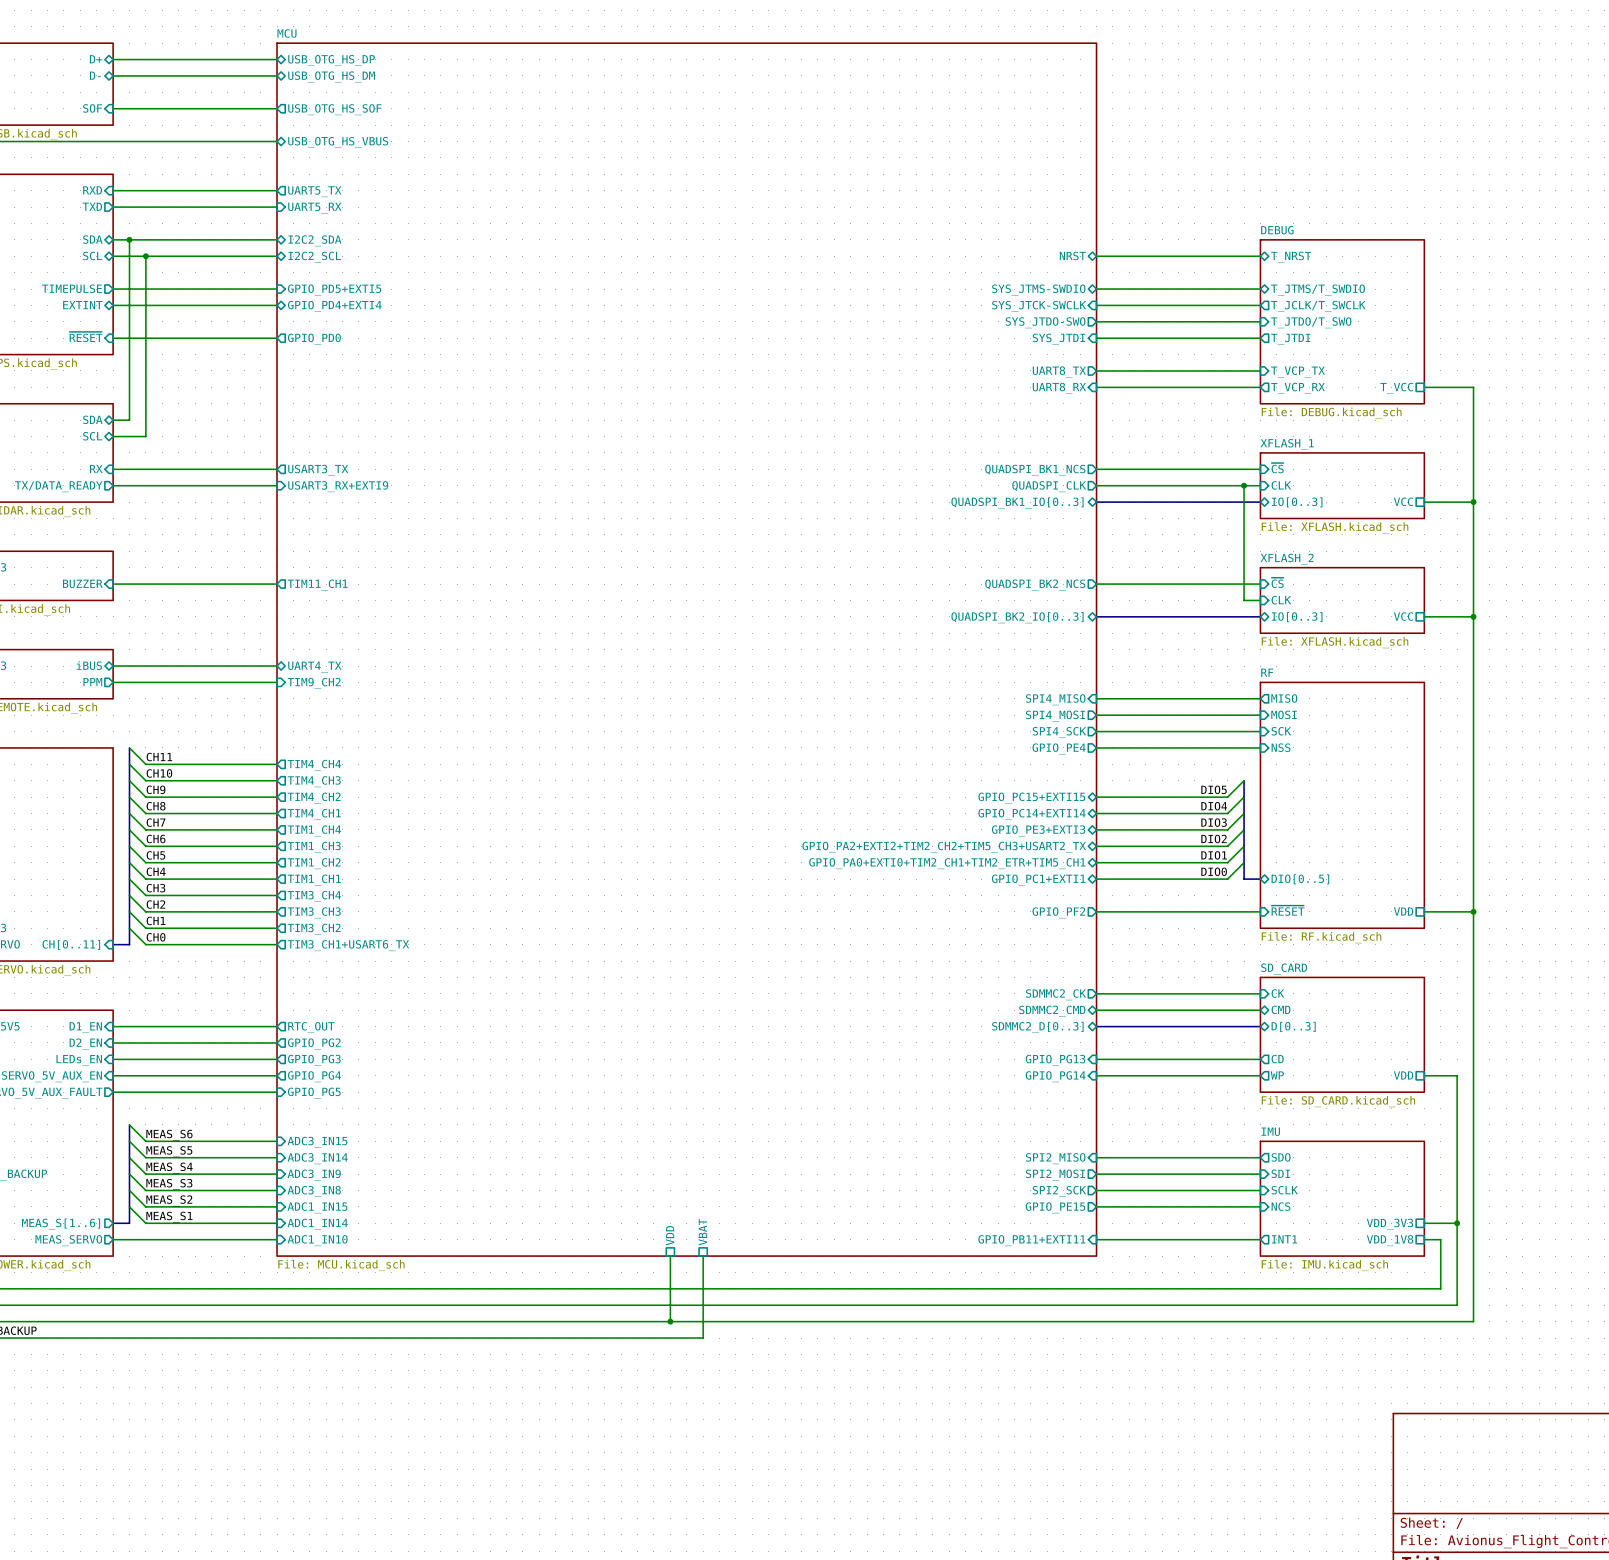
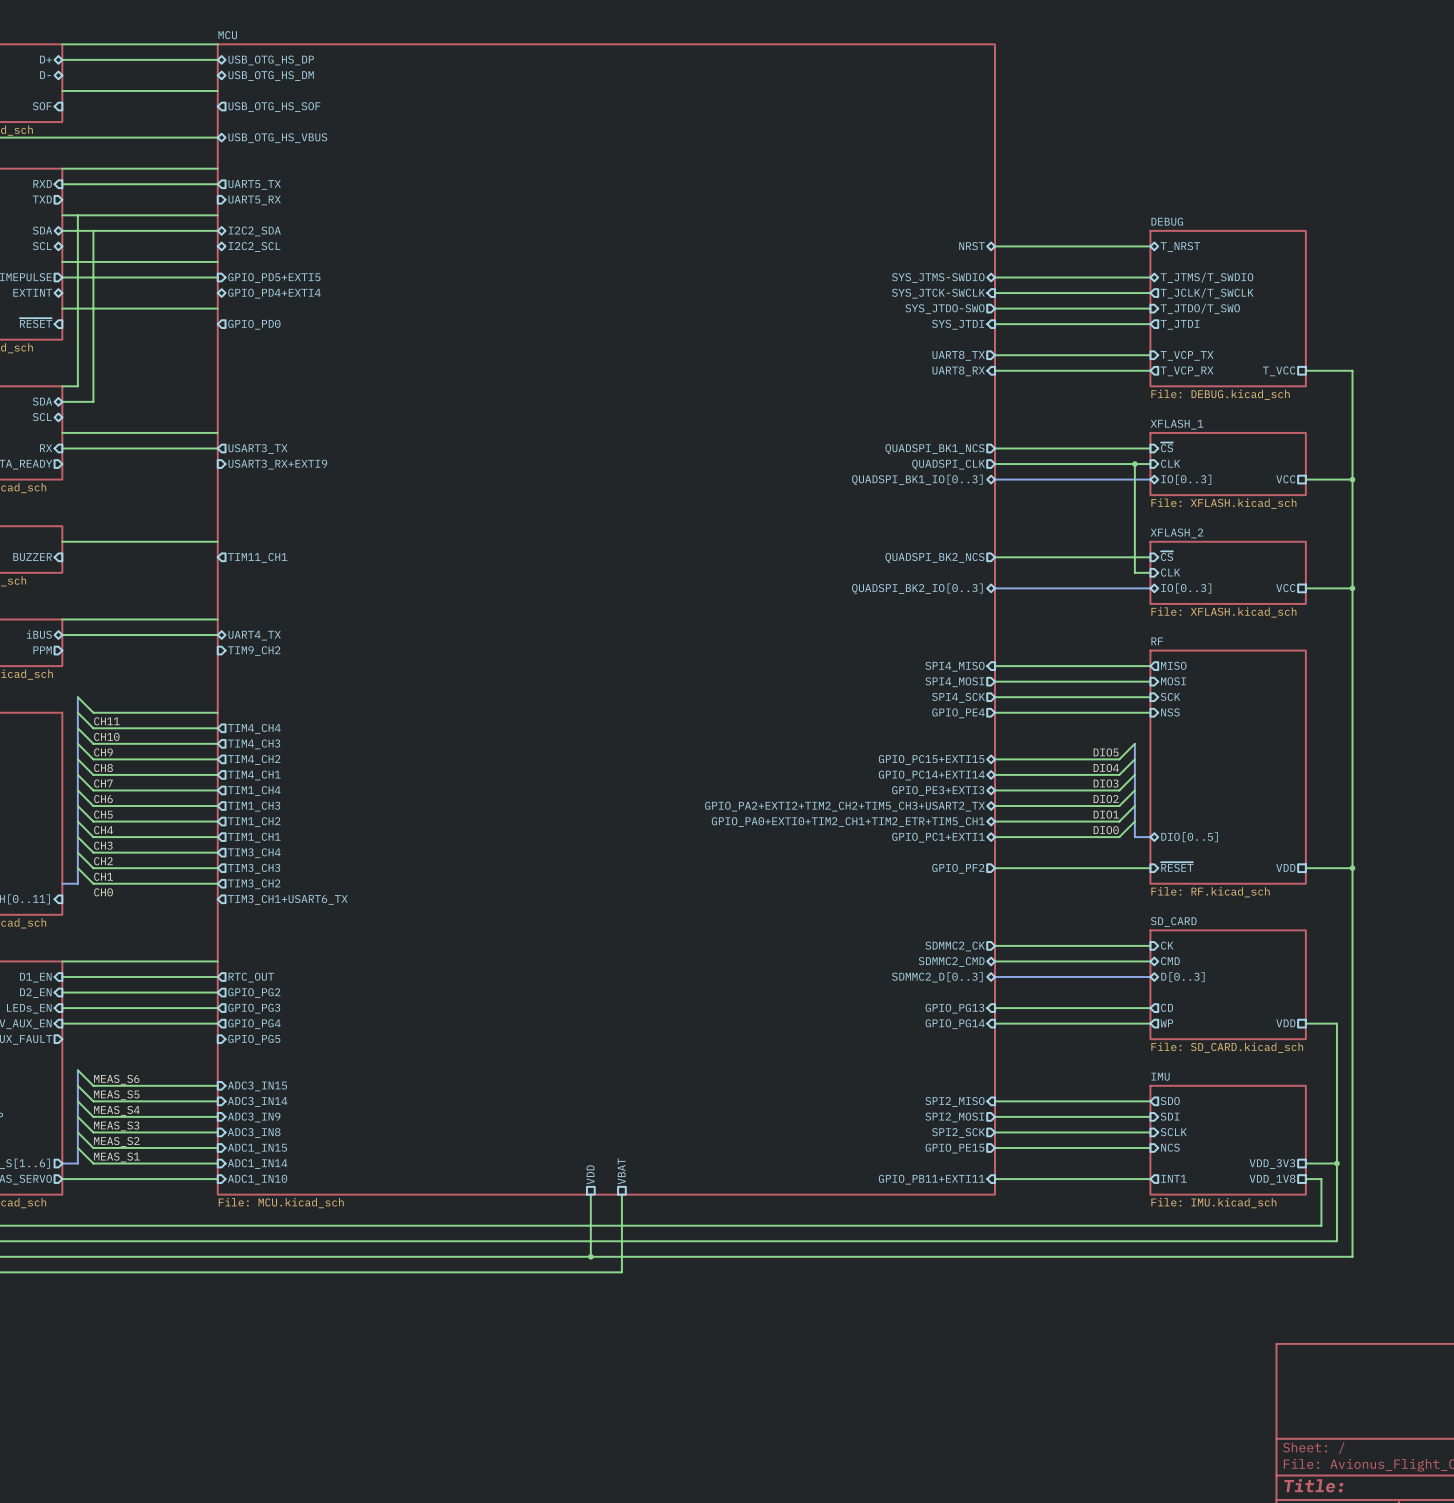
wire: (113, 75) (277, 75) -> (62, 44) (217, 44)
wire: (113, 108) (277, 108) -> (62, 90) (217, 90)
wire: (113, 207) (277, 207) -> (62, 168) (217, 168)
wire: none -> (77, 215) (77, 230)
junction: (129, 239) -> none
wire: none -> (93, 230) (93, 246)
wire: (113, 256) (277, 256) -> (62, 215) (217, 215)
junction: (145, 256) -> none
wire: (113, 305) (277, 305) -> (62, 261) (217, 261)
wire: (113, 338) (277, 338) -> (62, 308) (217, 308)
wire: (129, 403) (129, 420) -> (77, 386) (62, 386)
wire: (145, 420) (145, 436) (113, 436) -> (93, 401) (77, 401)
wire: (113, 485) (277, 485) -> (62, 432) (217, 432)
wire: (113, 584) (277, 584) -> (62, 541) (217, 541)
wire: (113, 682) (277, 682) -> (62, 619) (217, 619)
wire: none -> (77, 697) (93, 712) (217, 712)
bus: none -> (77, 697) (77, 712)
wire: (129, 928) (145, 944) (277, 944) -> none
bus: (129, 928) (129, 944) (113, 944) -> (77, 883) (62, 883)
wire: (113, 1092) (277, 1092) -> (62, 961) (217, 961)

